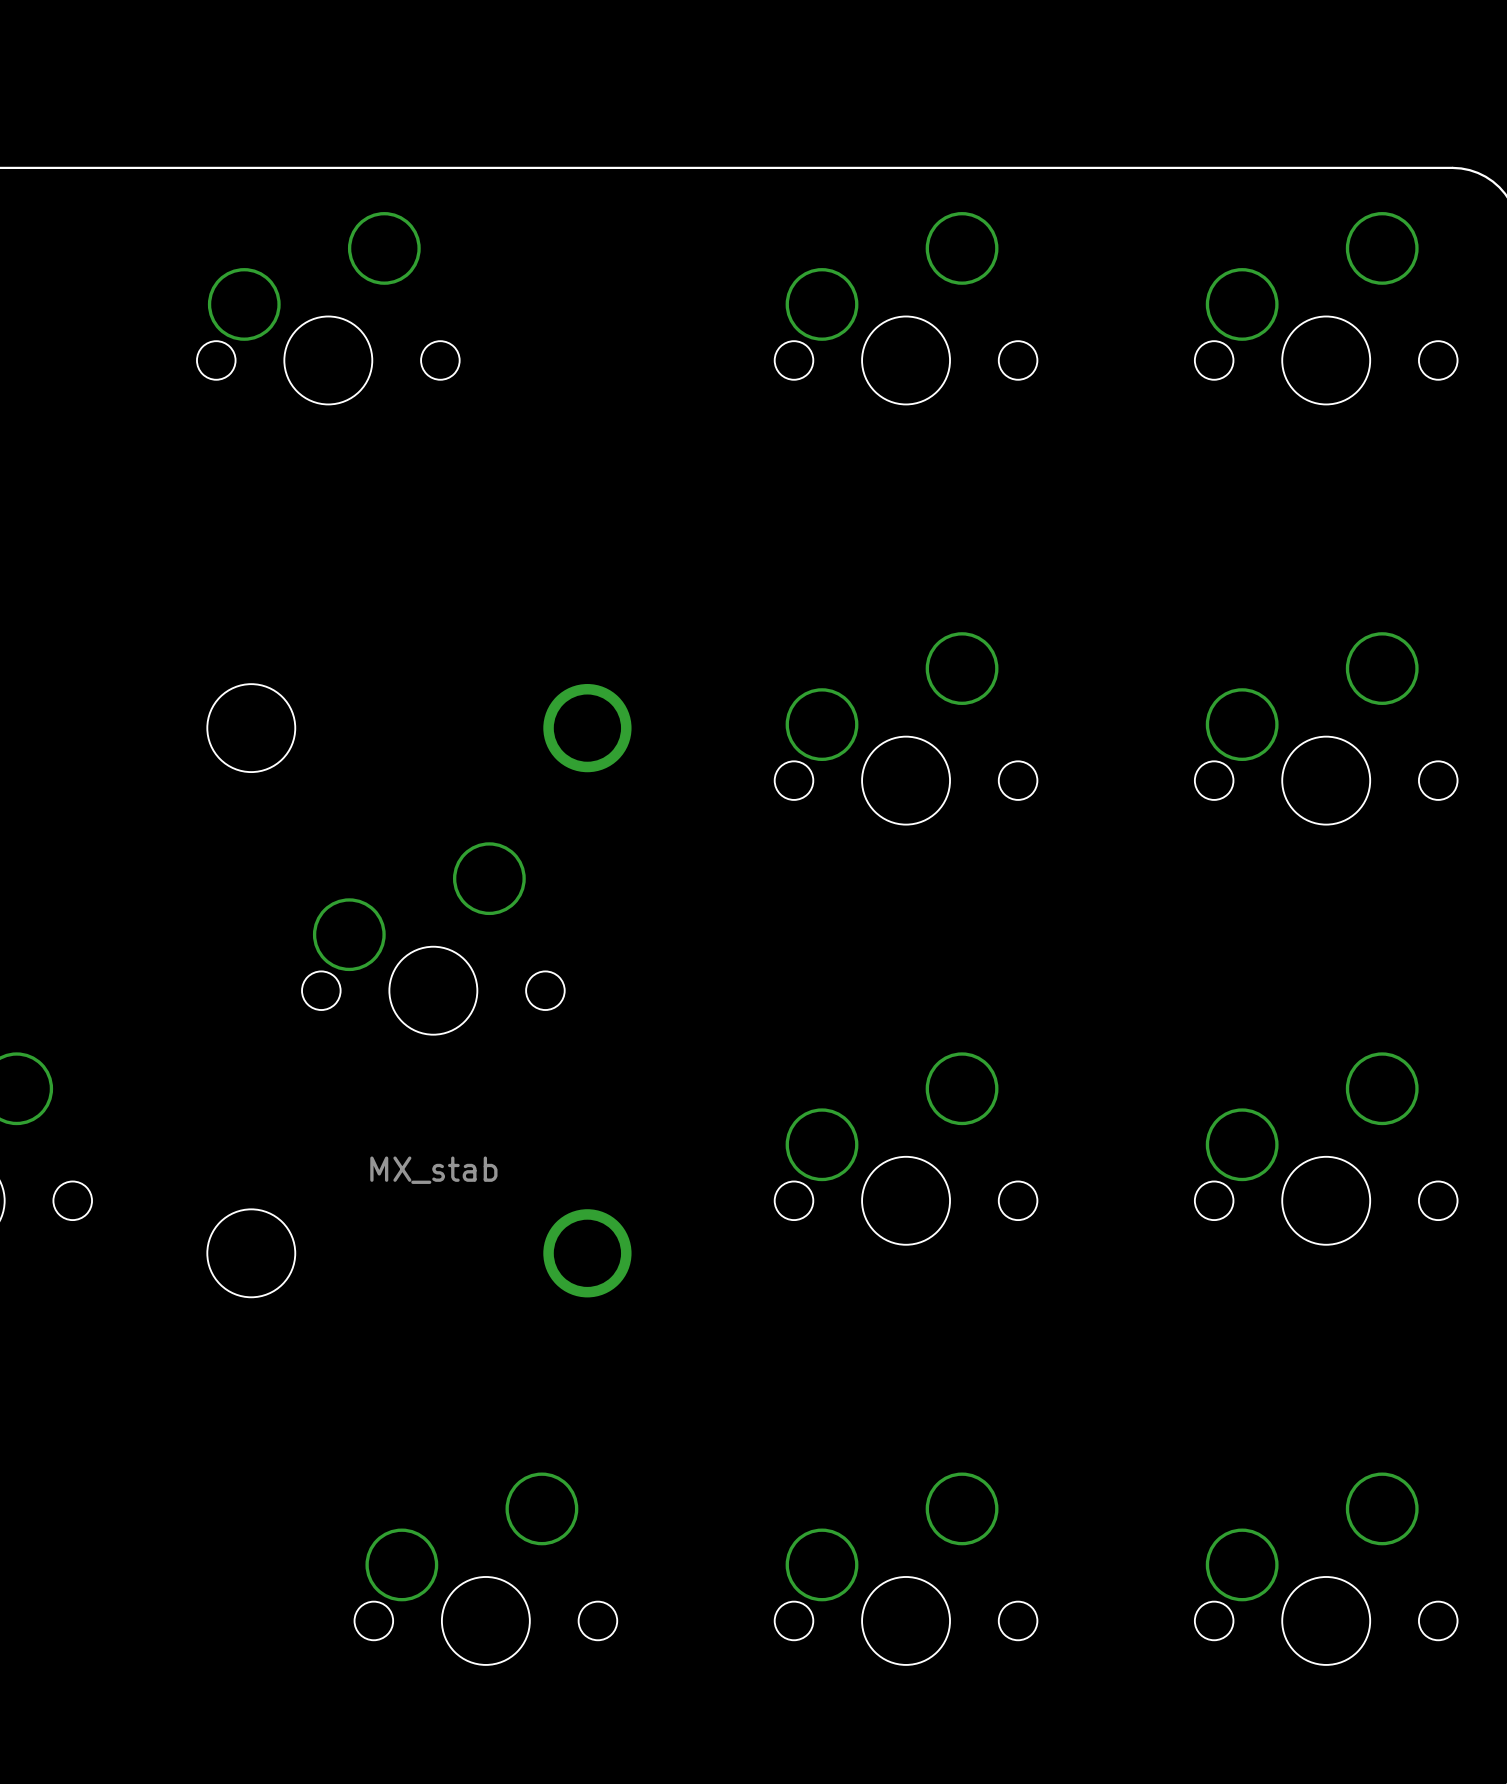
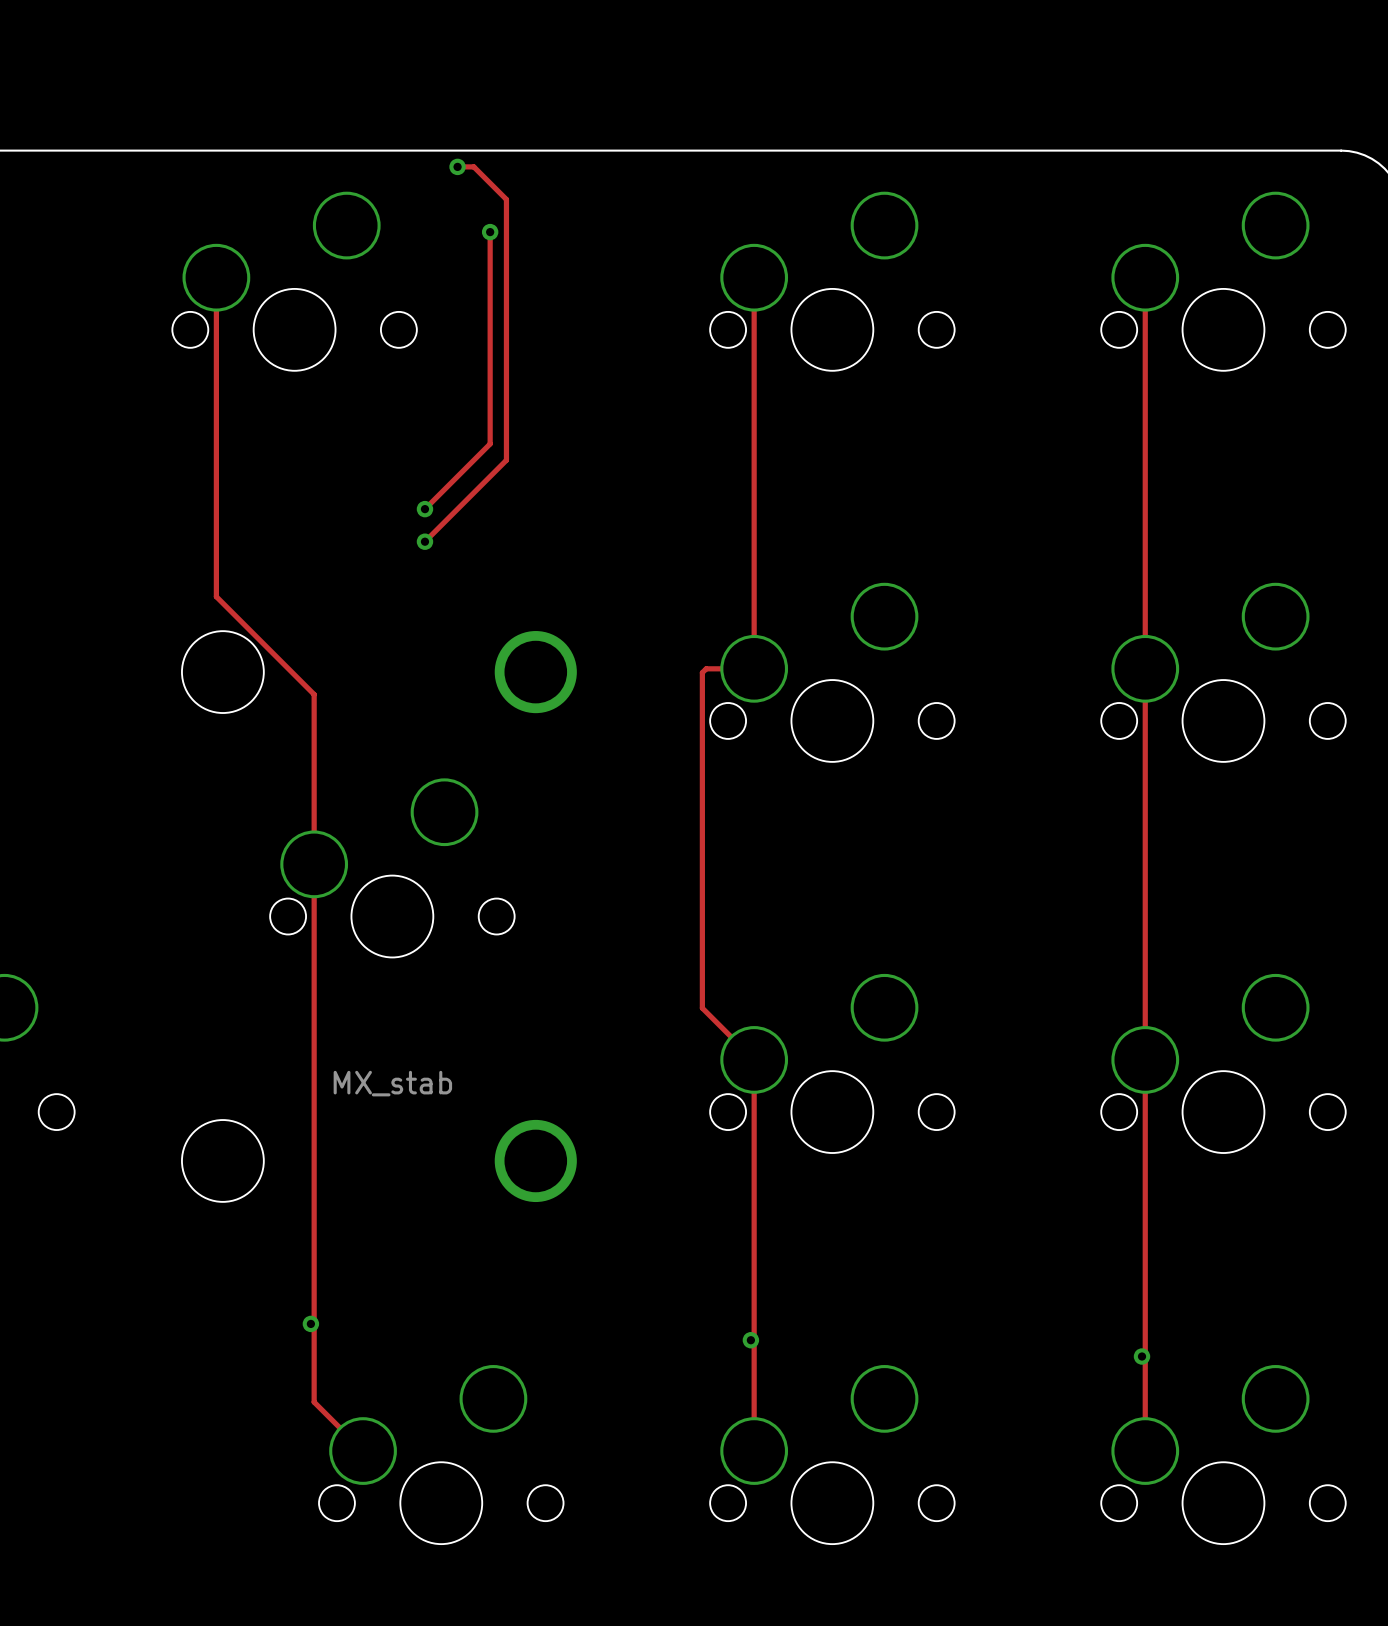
track: none -> (457, 166) (473, 166) (506, 199) (506, 460) (424, 541)
via: none -> (457, 166)
track: none -> (490, 232) (490, 443) (424, 509)
via: none -> (490, 232)
track: none -> (216, 277) (216, 596) (314, 694) (314, 1320) (310, 1323) (314, 1327) (314, 1402) (363, 1451)
track: none -> (754, 277) (754, 668) (706, 668) (702, 672) (702, 1008) (754, 1059) (754, 1336) (750, 1340) (754, 1343) (754, 1451)
track: none -> (1145, 277) (1145, 1353) (1142, 1356) (1145, 1359) (1145, 1451)
via: none -> (424, 509)
via: none -> (424, 541)
via: none -> (310, 1323)
via: none -> (750, 1340)
via: none -> (1142, 1356)

